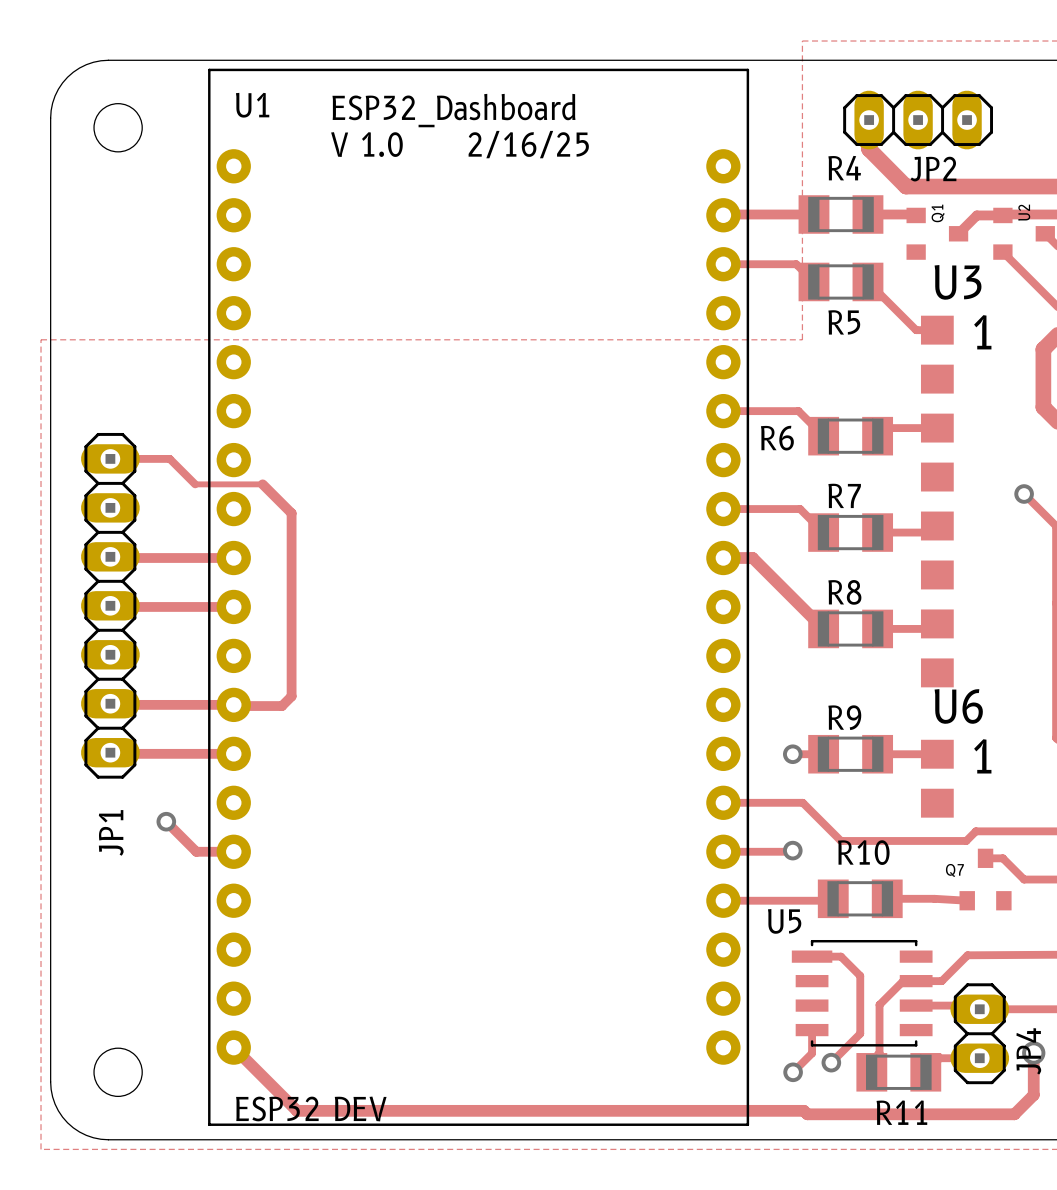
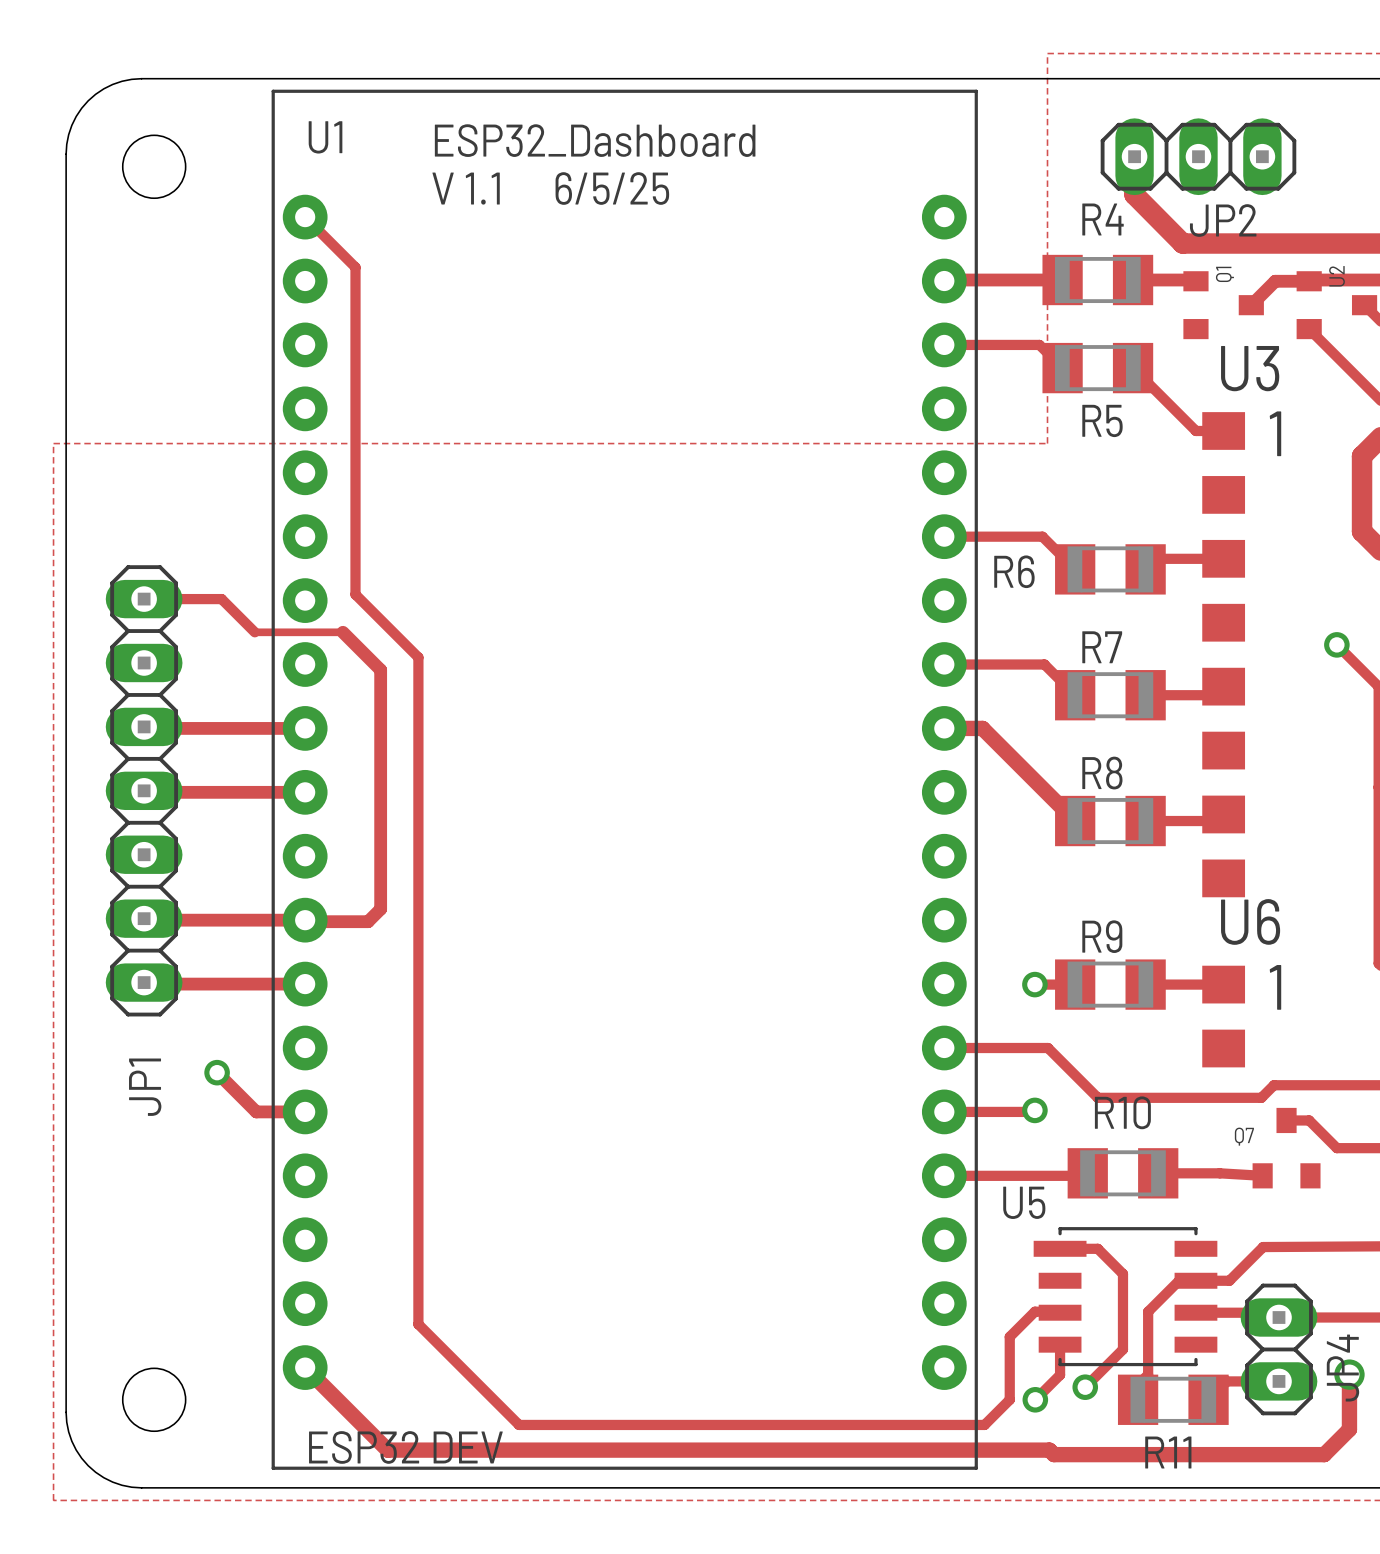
text: V 1.0 2/16/25 (460, 144) -> V 1.1 6/5/25 (550, 188)
track: none -> (305, 217) (355, 267) (355, 594) (418, 657) (418, 1324) (519, 1424) (984, 1424) (1009, 1399) (1009, 1336) (1034, 1311) (1060, 1312)

